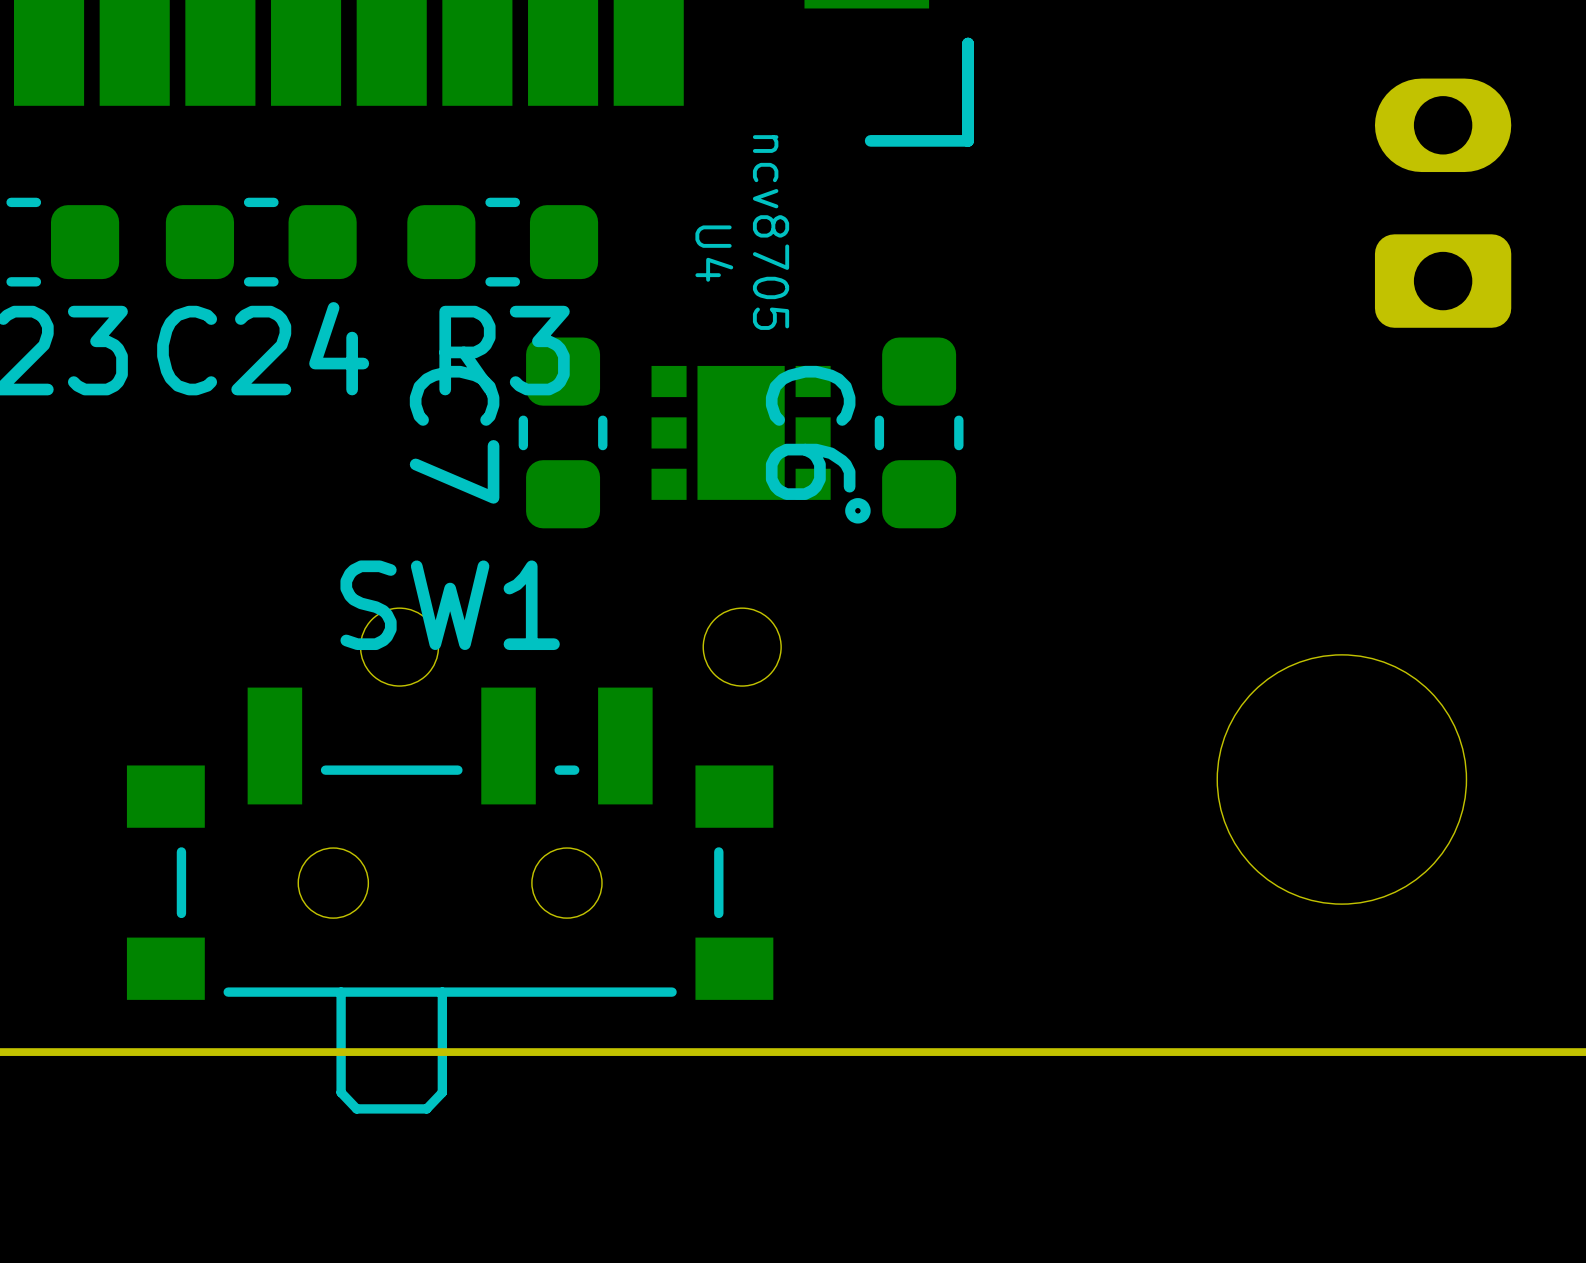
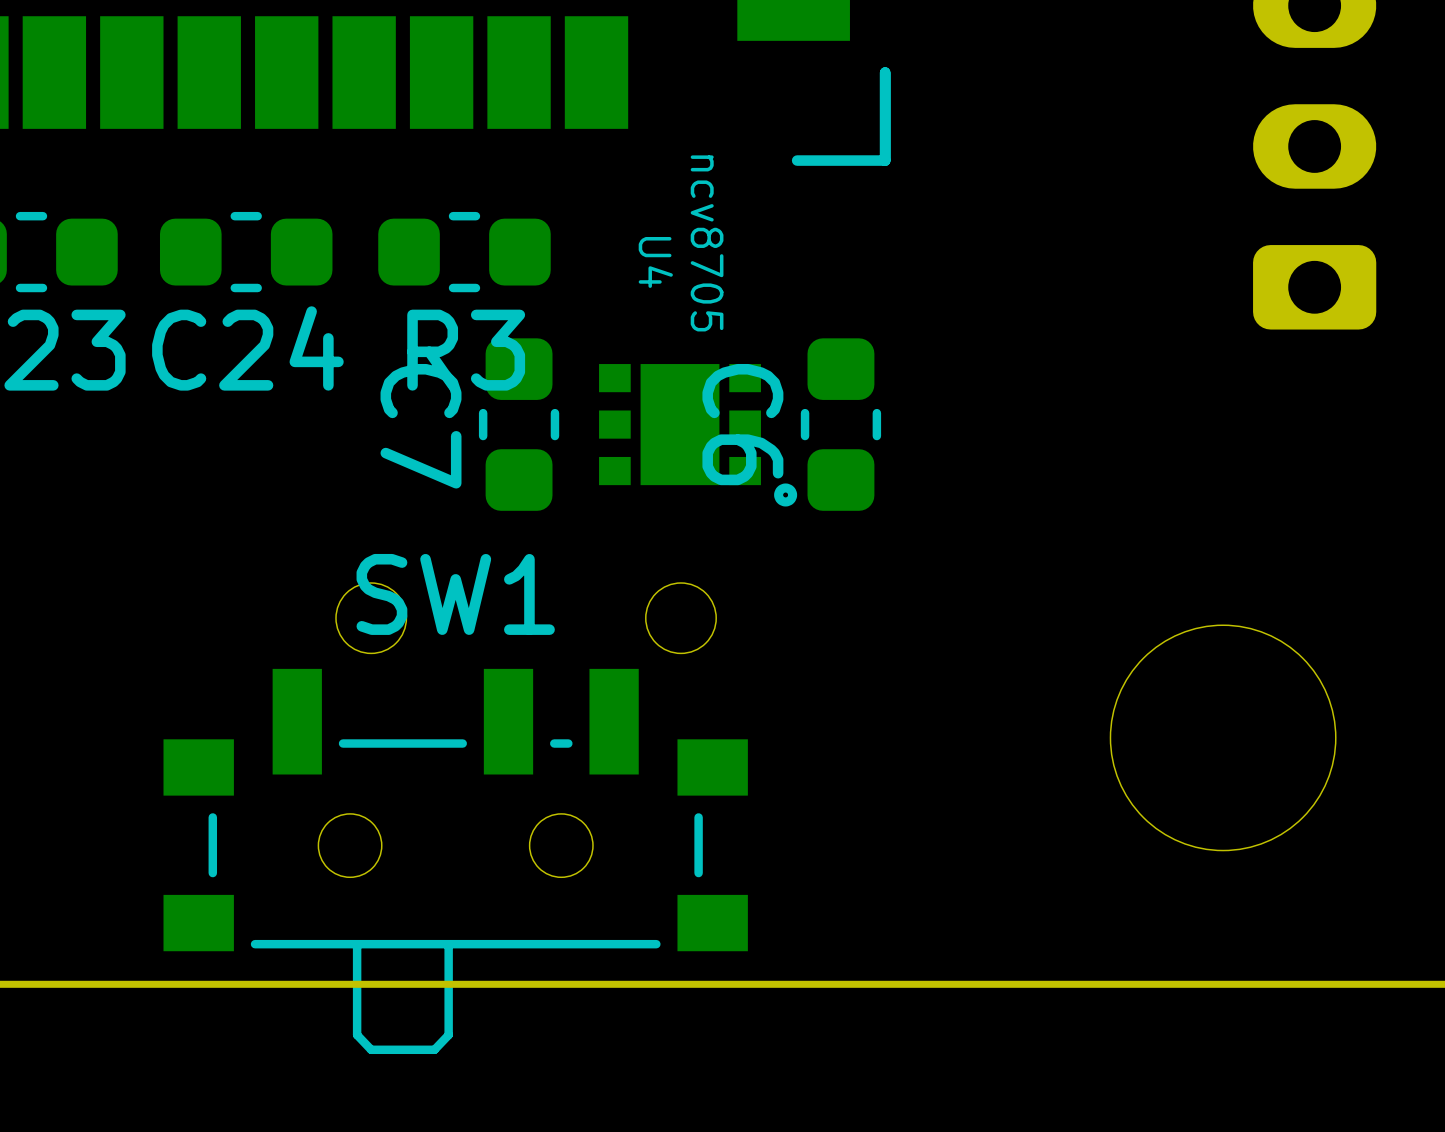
SW1 position: (450, 900) -> (455, 861)

